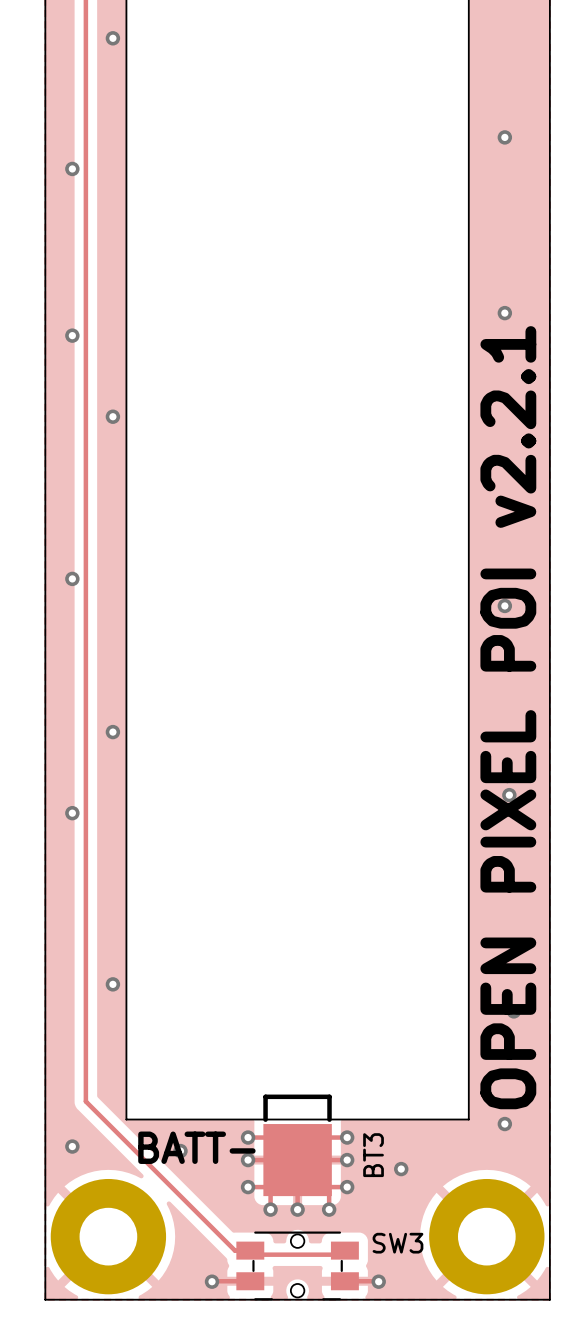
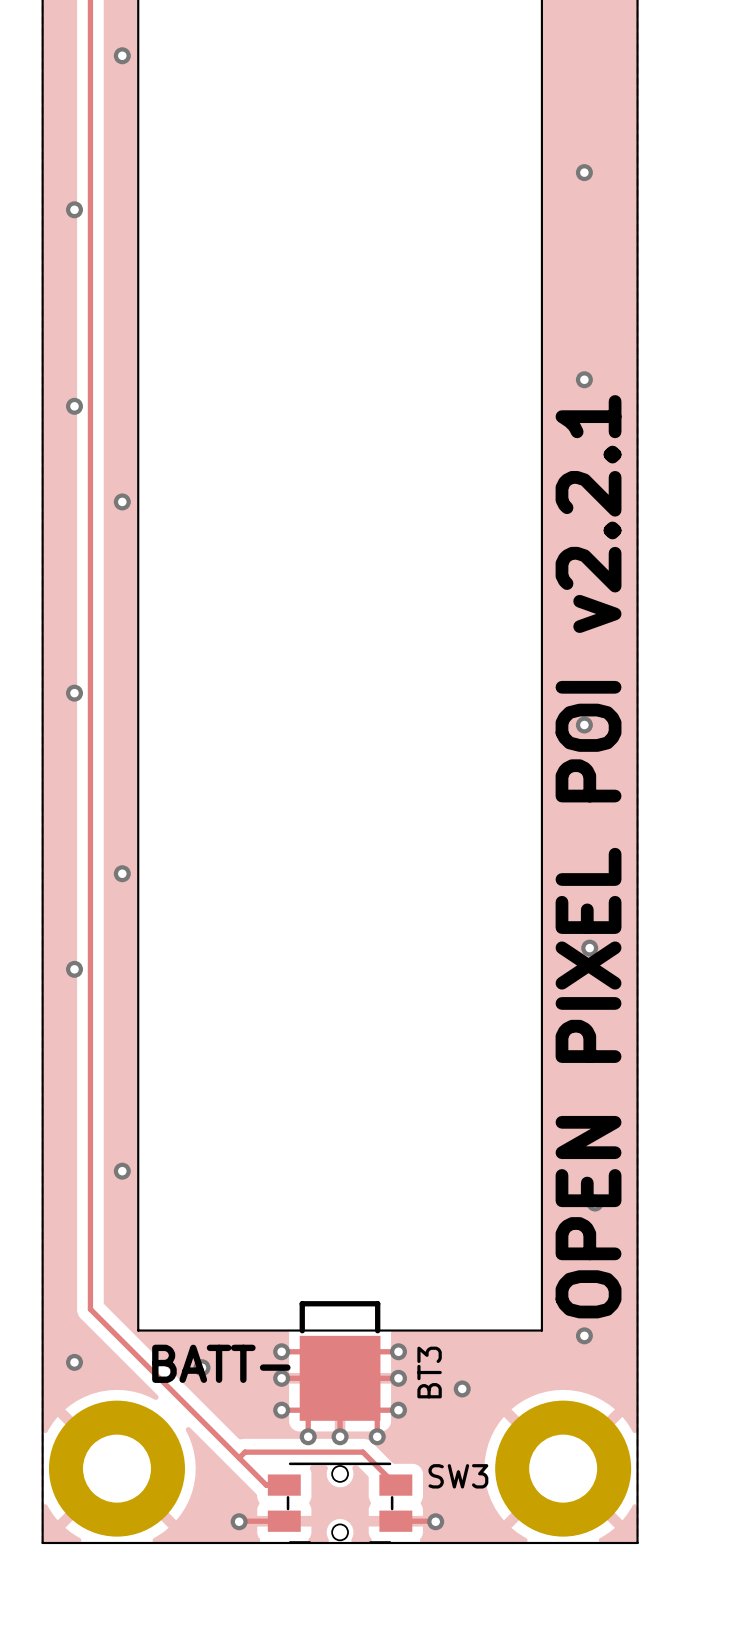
track: none -> (239, 1458) (245, 1452) (362, 1452) (395, 1485)
track: (254, 1254) (340, 1254) -> none

